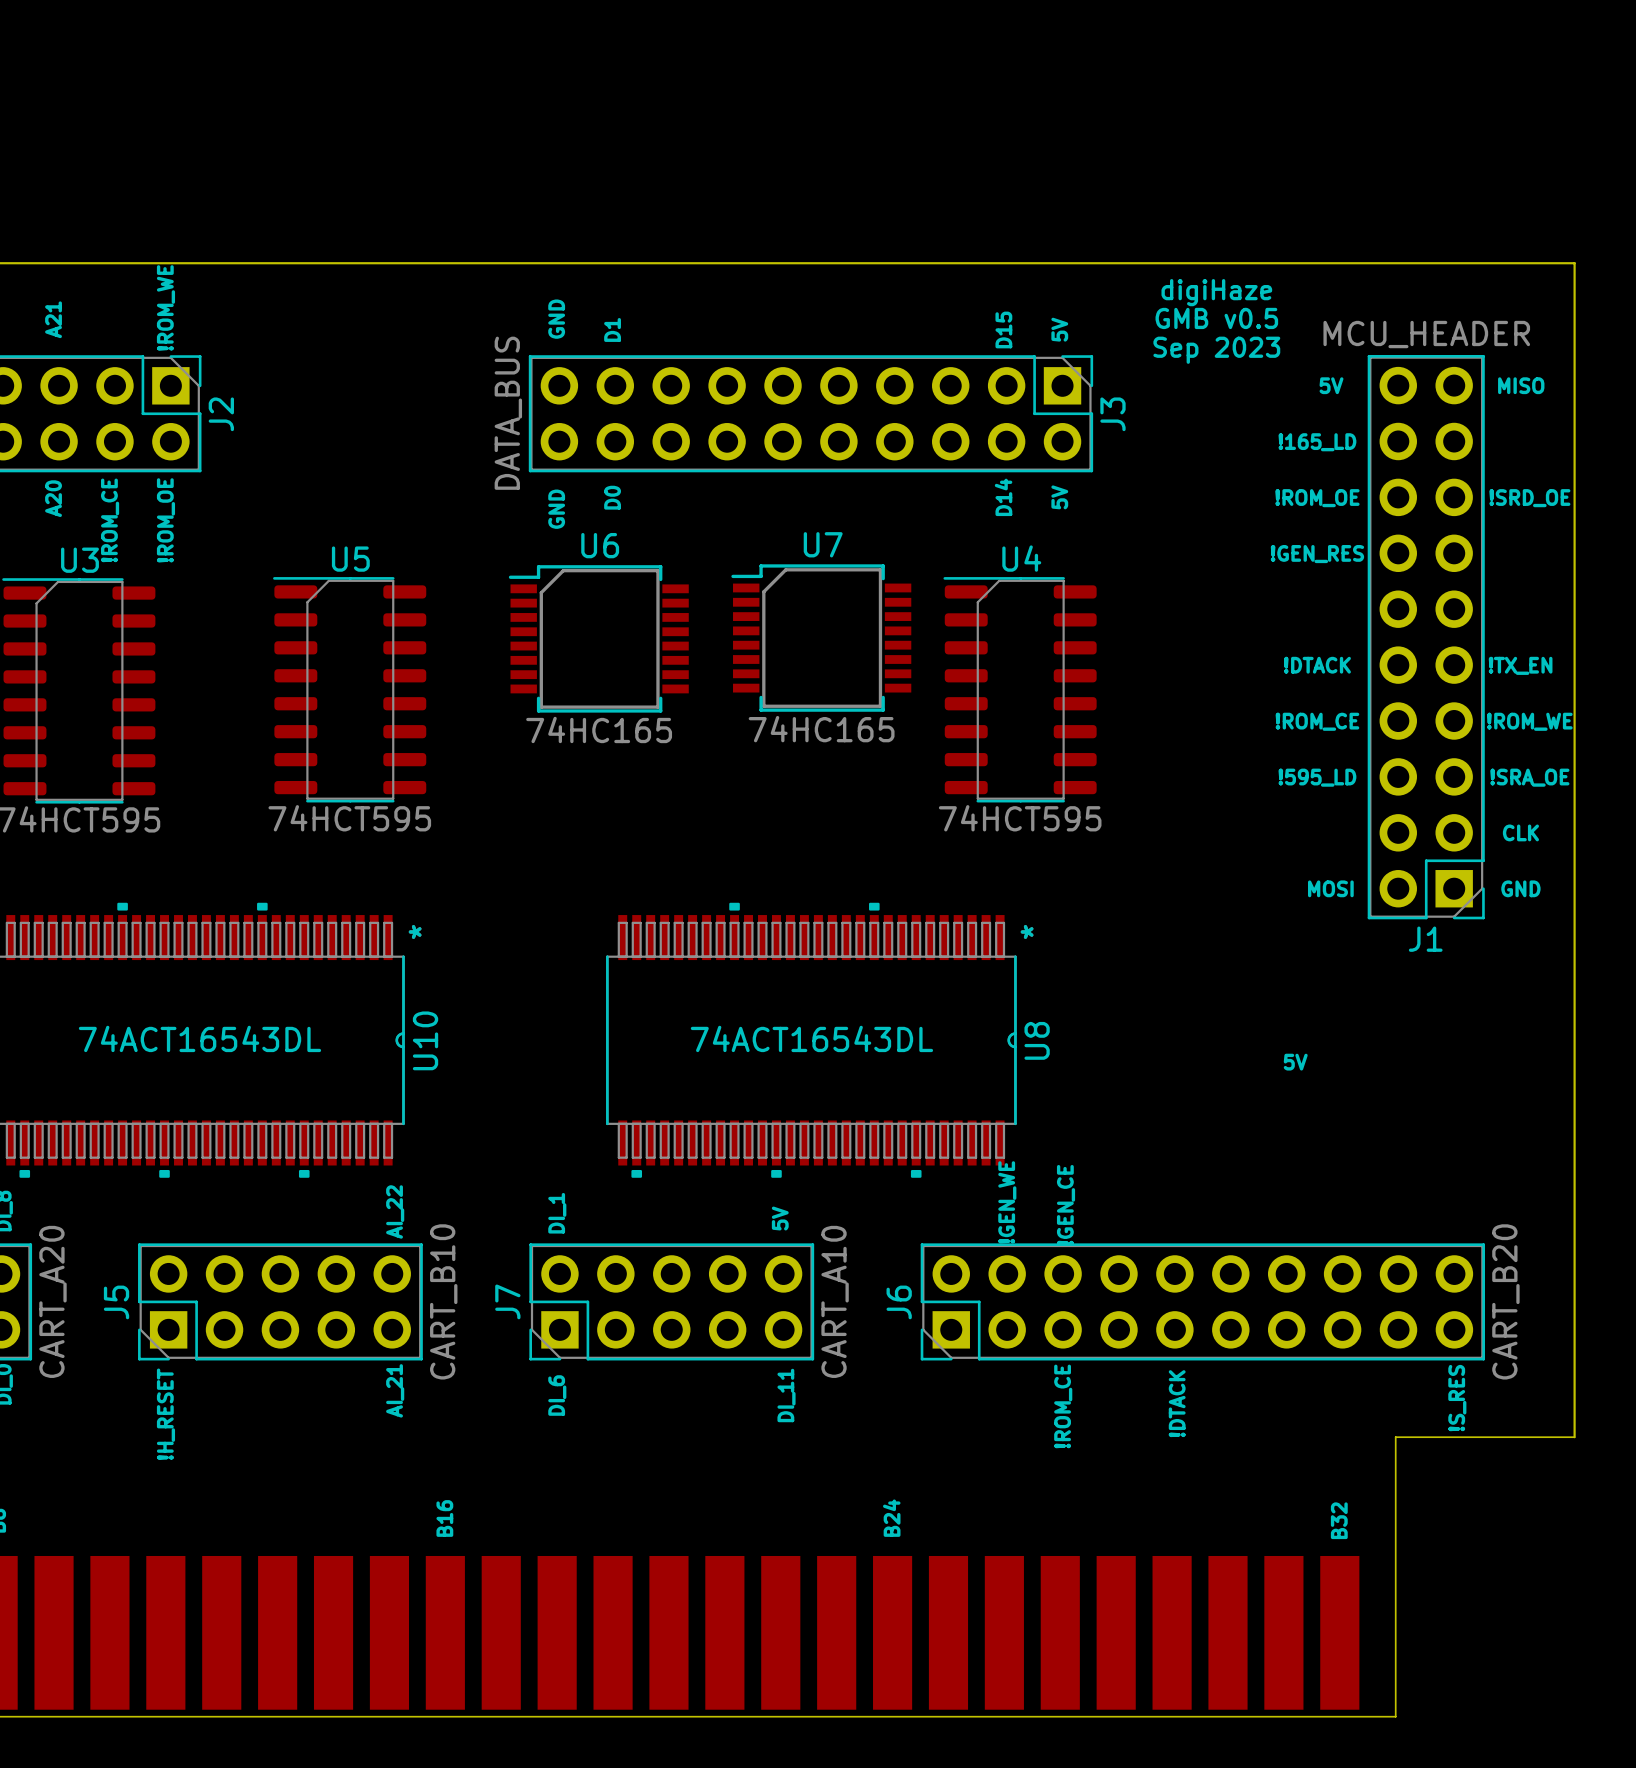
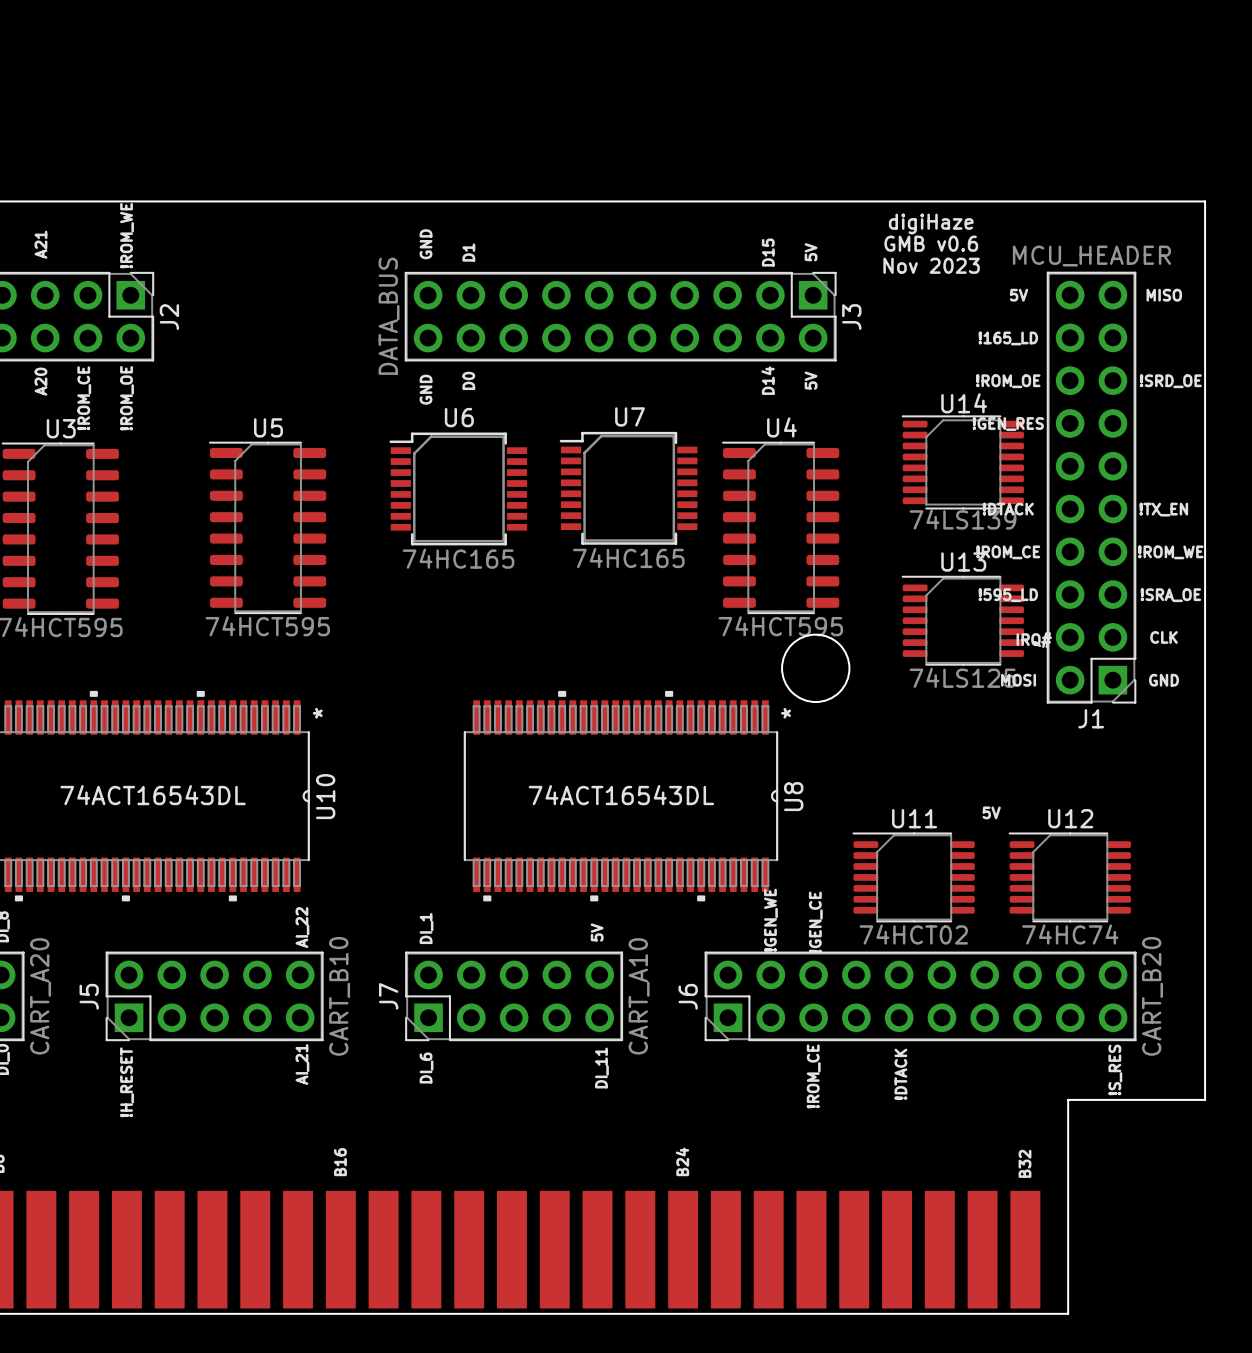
text: GMB v0.5 (1216, 318) -> GMB v0.6 (931, 243)
text: Sep 2023 (1216, 350) -> Nov 2023 (931, 265)
U14: none -> 74LS139 (962, 462)
U13: none -> 74LS125 (962, 620)
round board edge: none -> [781, 634, 850, 703]
text: none -> IRQ# (1034, 640)
U11: none -> 74HCT02 (913, 877)
U12: none -> 74HC74 (1069, 877)

